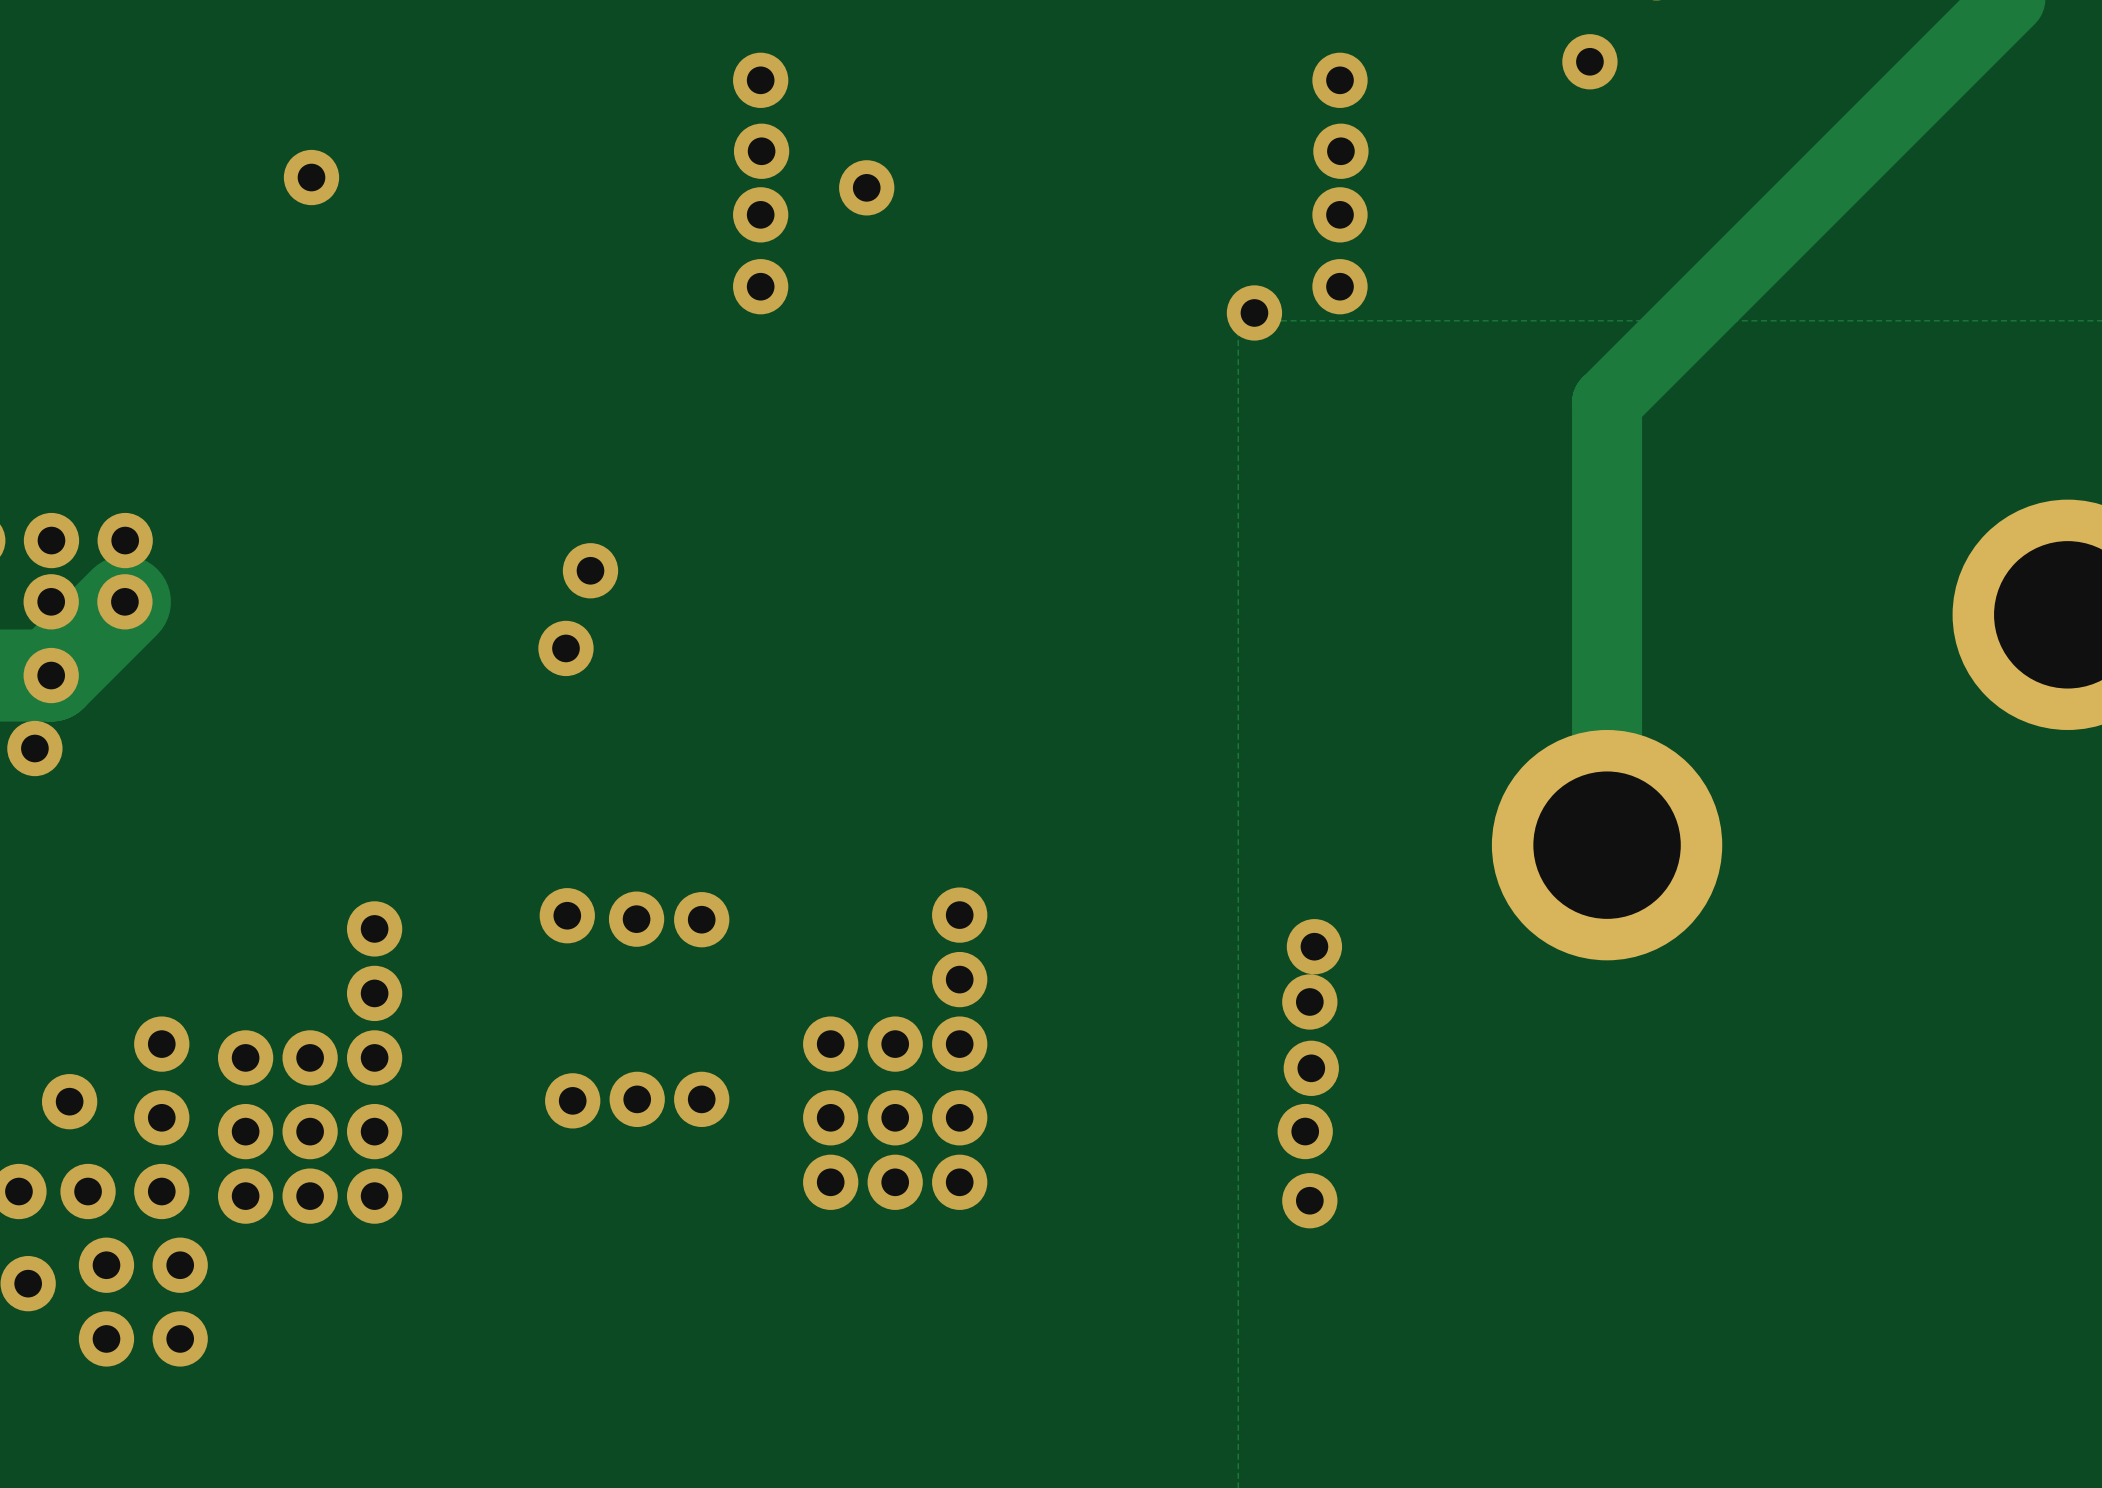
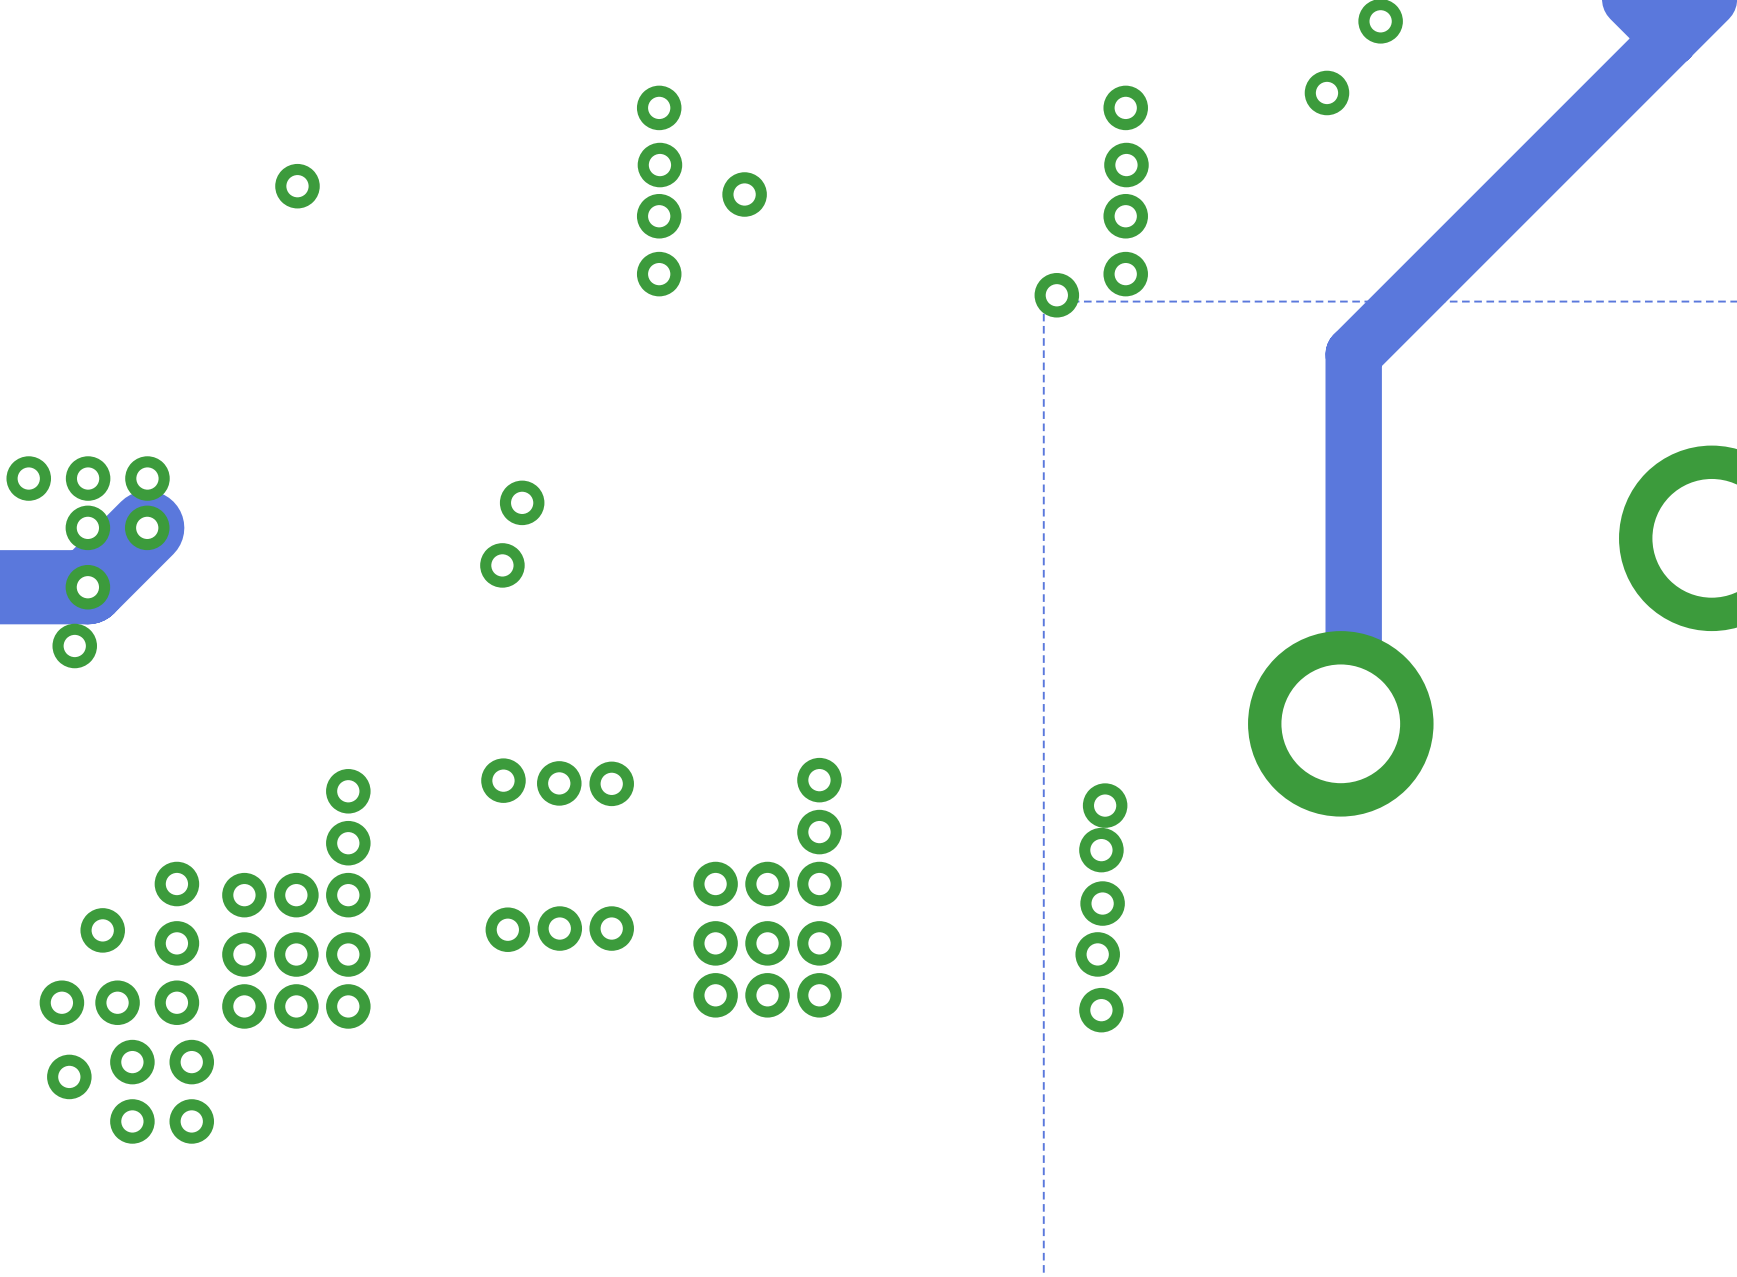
track: (1623, 386) (1607, 402) (1607, 836) -> (1353, 354) (1353, 722) (1350, 726)

